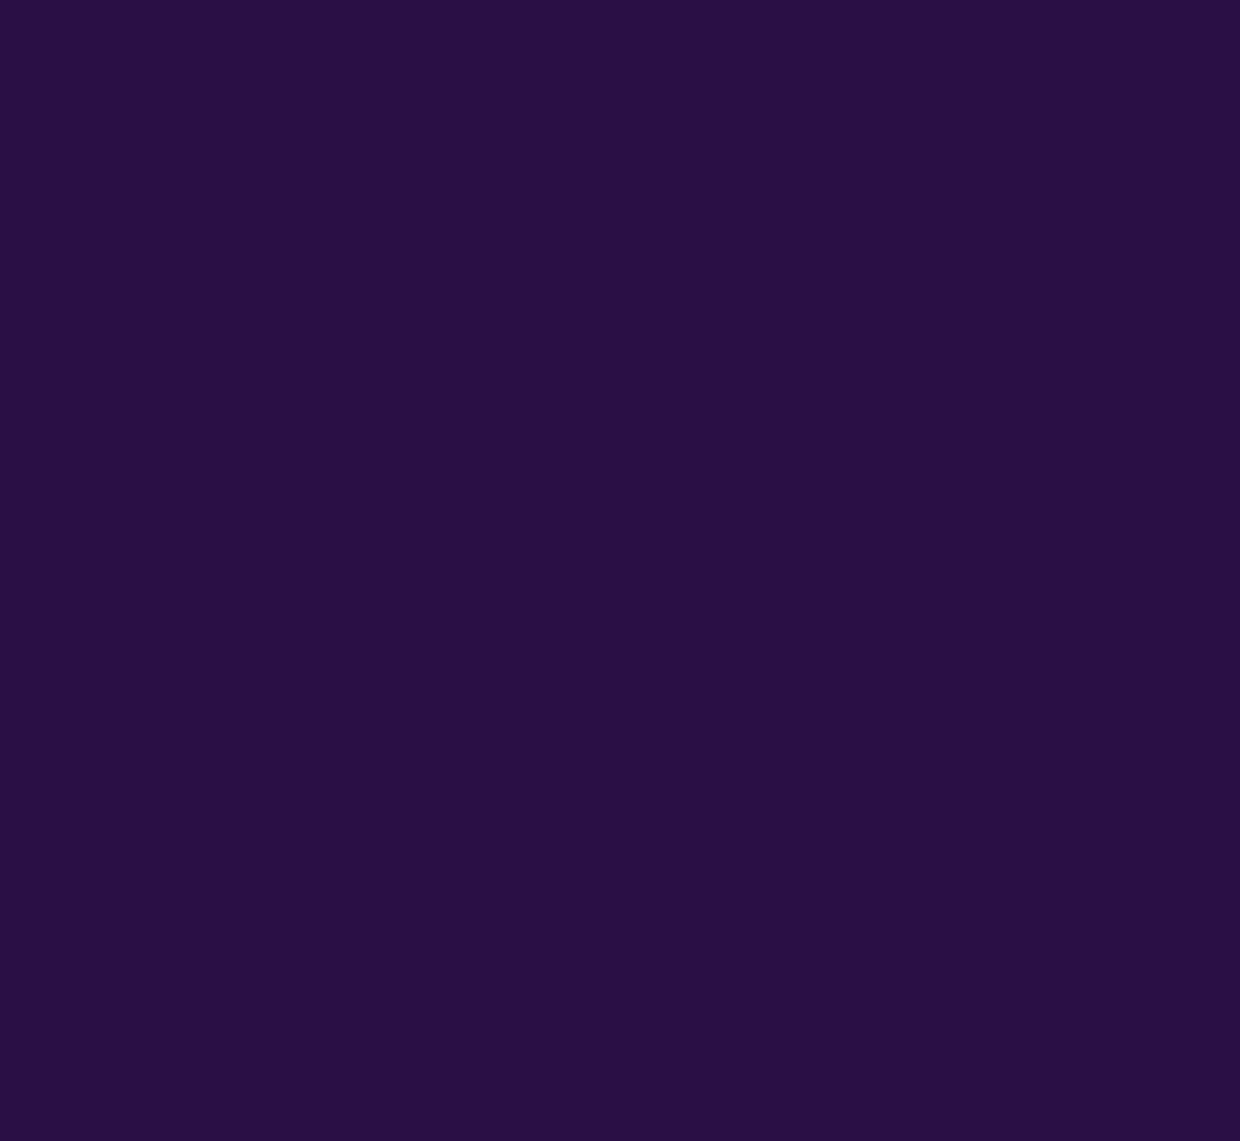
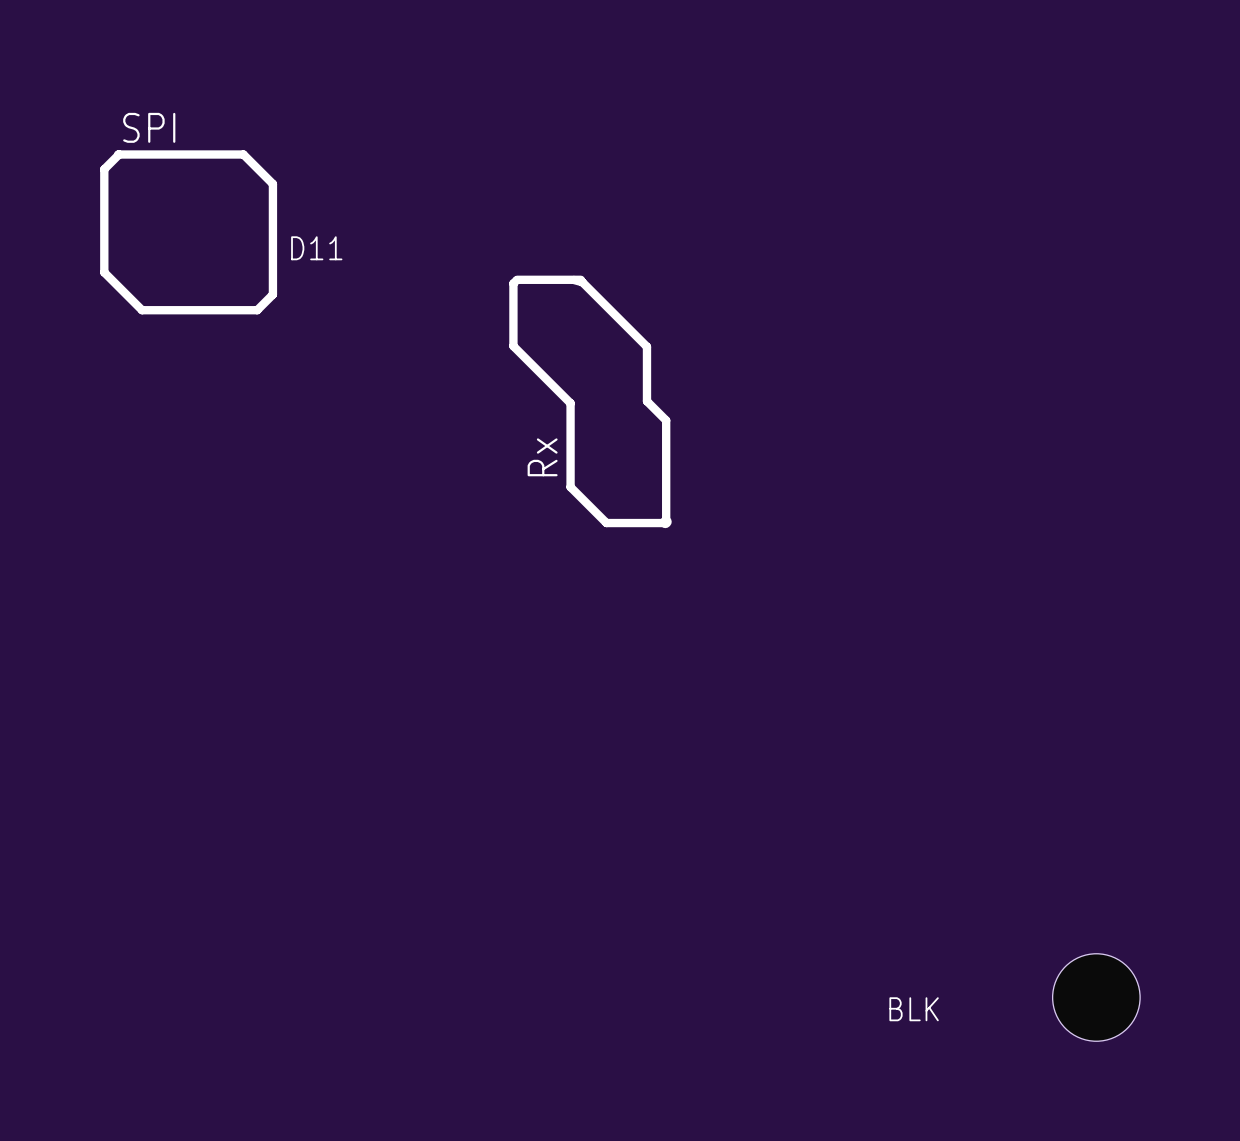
text: none -> SPI (149, 127)
line: none -> (118, 154) (243, 154) (272, 183) (272, 294) (257, 310) (142, 310) (104, 272) (104, 169) (119, 154)
text: none -> D11 (316, 248)
line: none -> (517, 279) (580, 279)
line: none -> (574, 279) (582, 282) (646, 346) (646, 401) (666, 420) (665, 522)
line: none -> (516, 280) (513, 283) (513, 346) (570, 403) (570, 487) (606, 523) (664, 523) (664, 521)
text: none -> Rx (542, 457)
hole: none -> (1096, 997)
text: none -> BLK (914, 1009)

